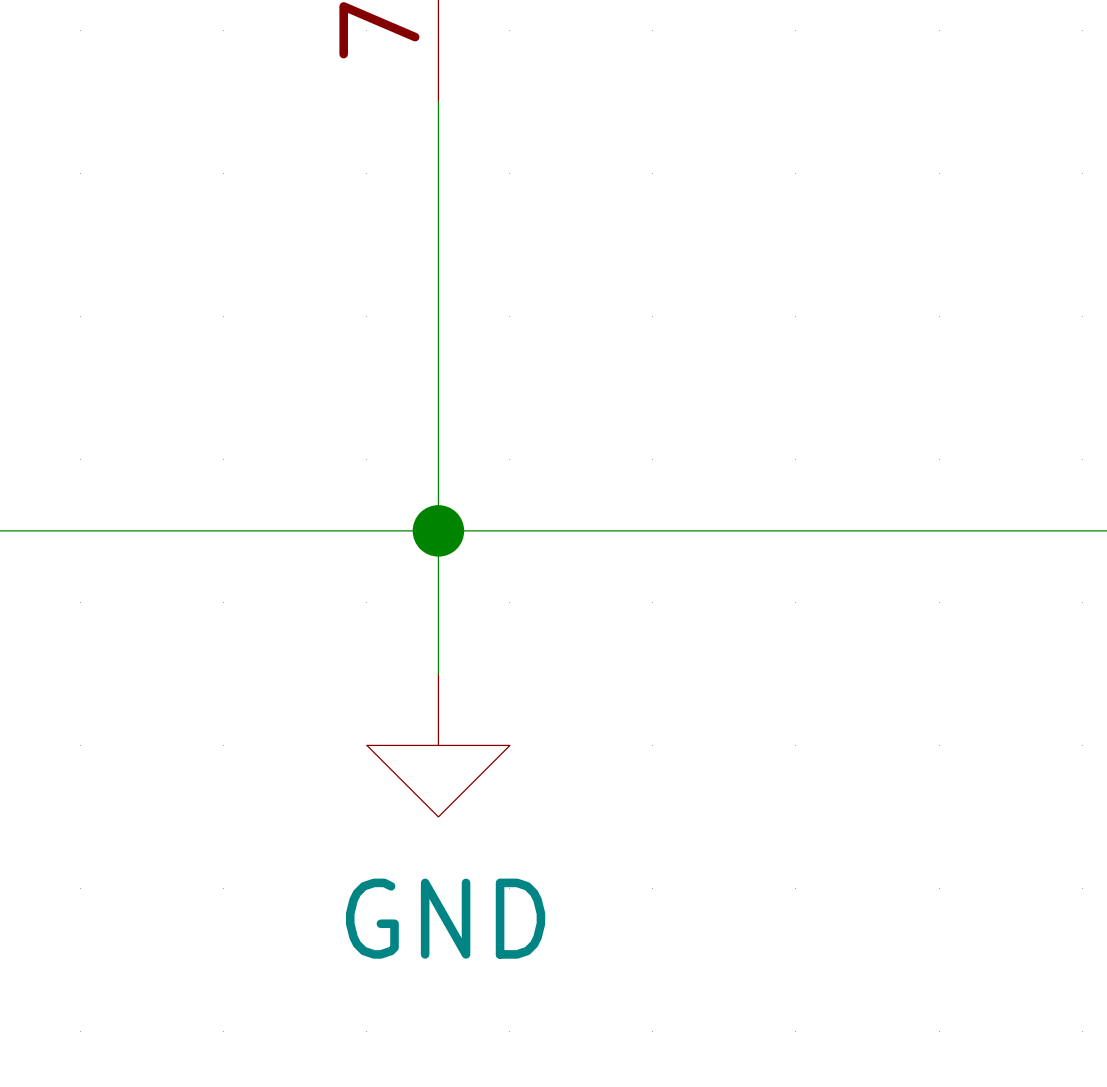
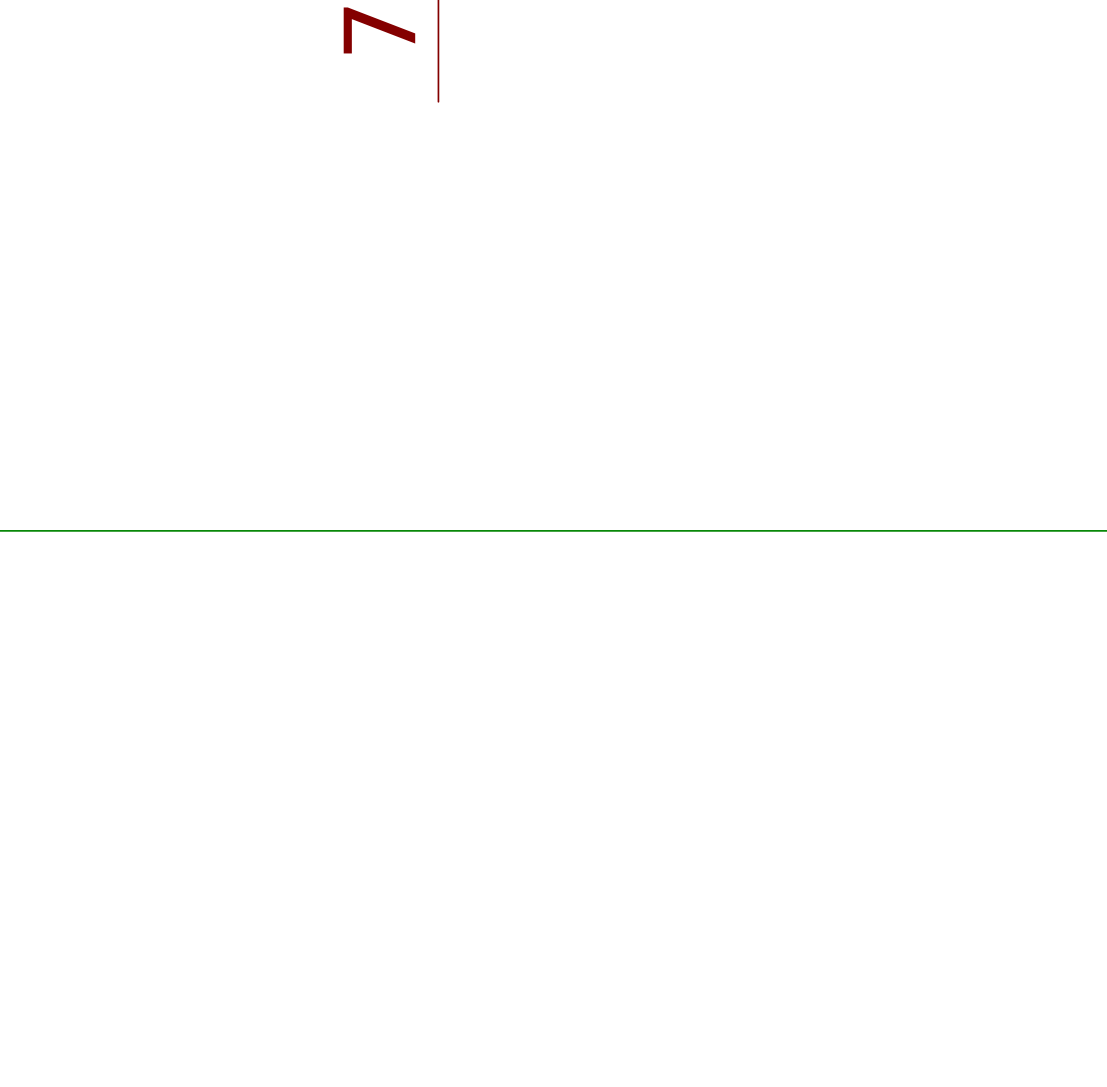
wire: (438, 101) (438, 673) -> none
junction: (438, 530) -> none
power symbol: GND (438, 745) -> none

